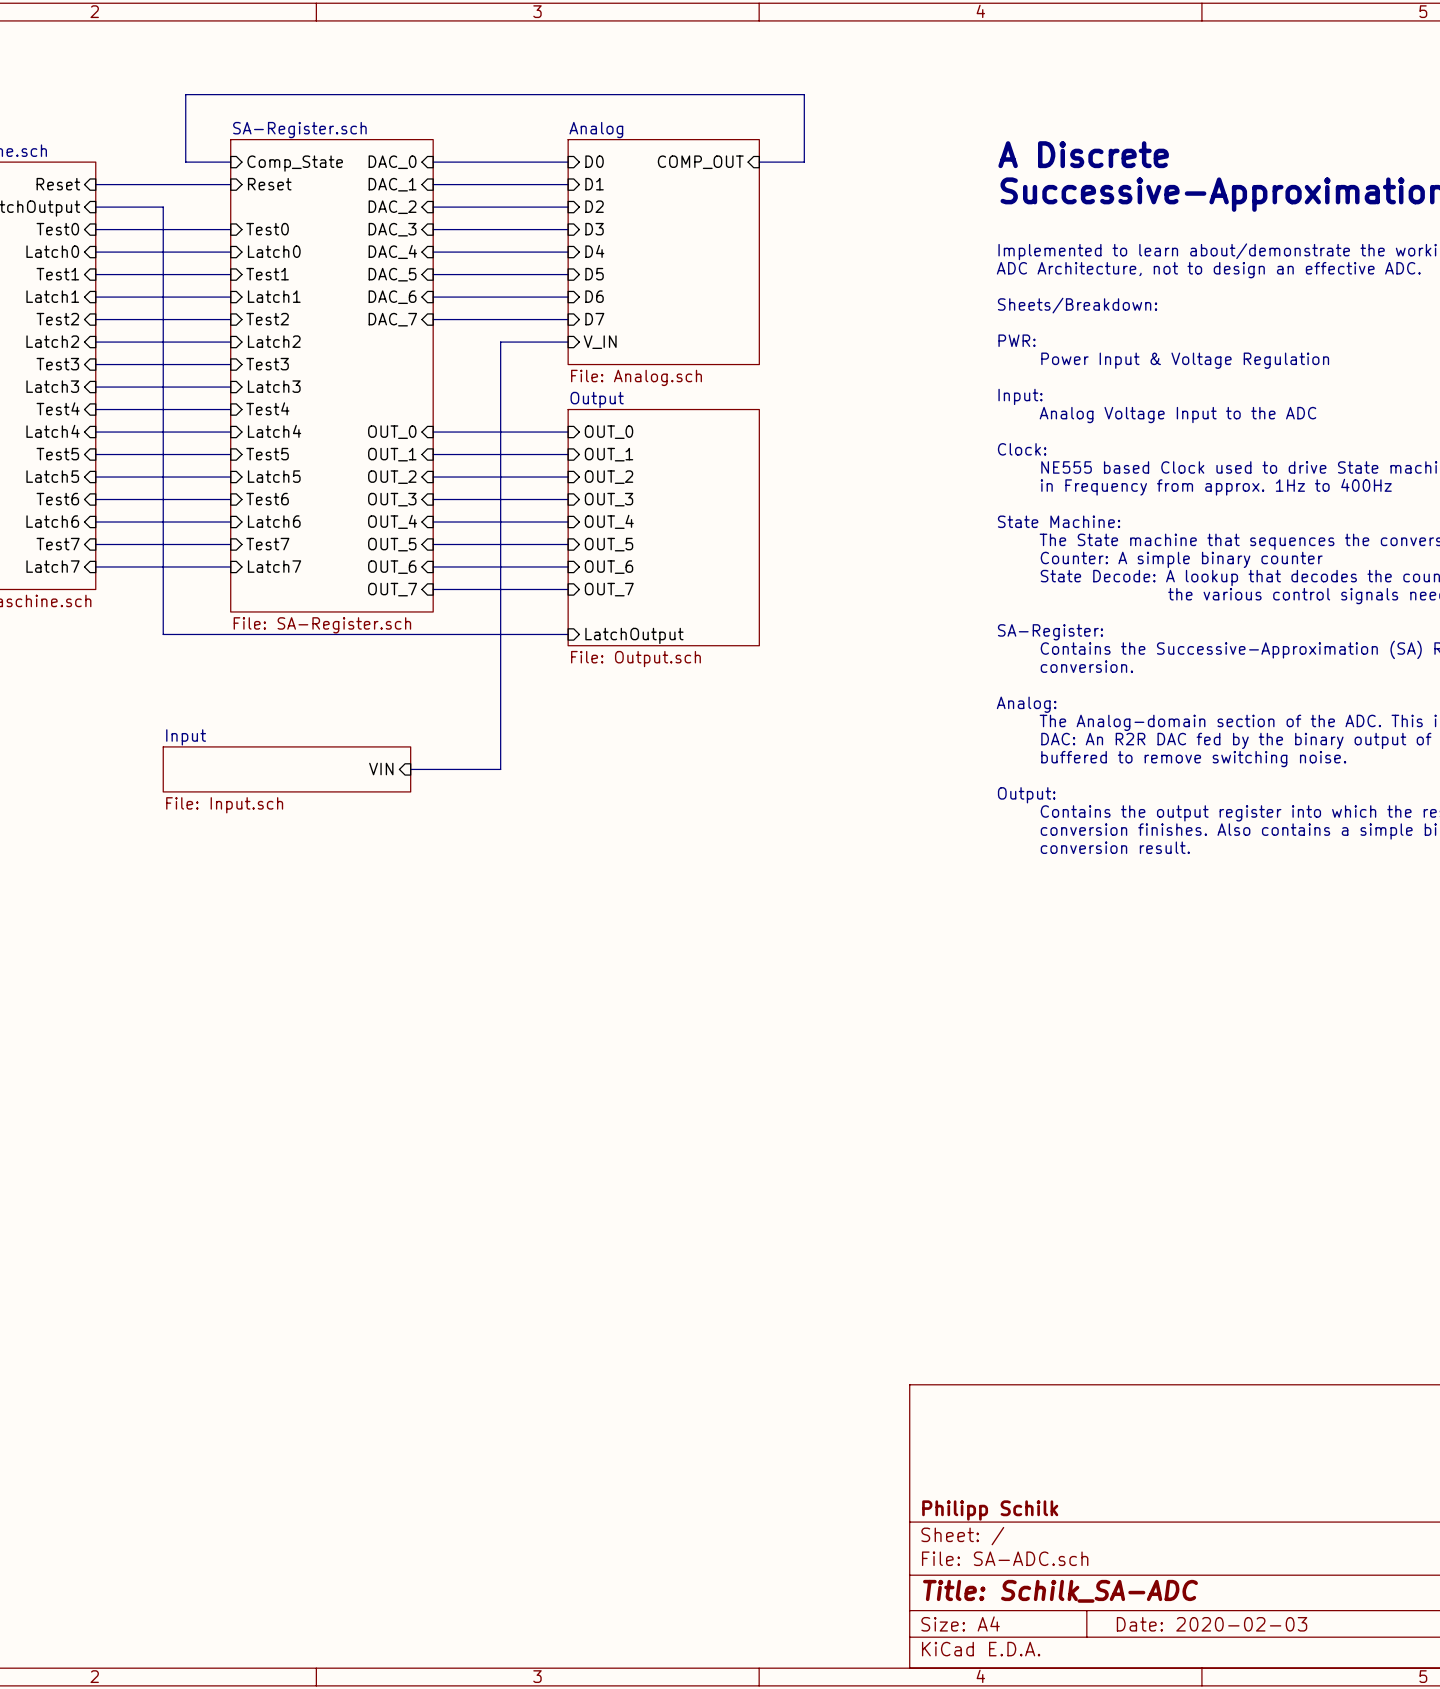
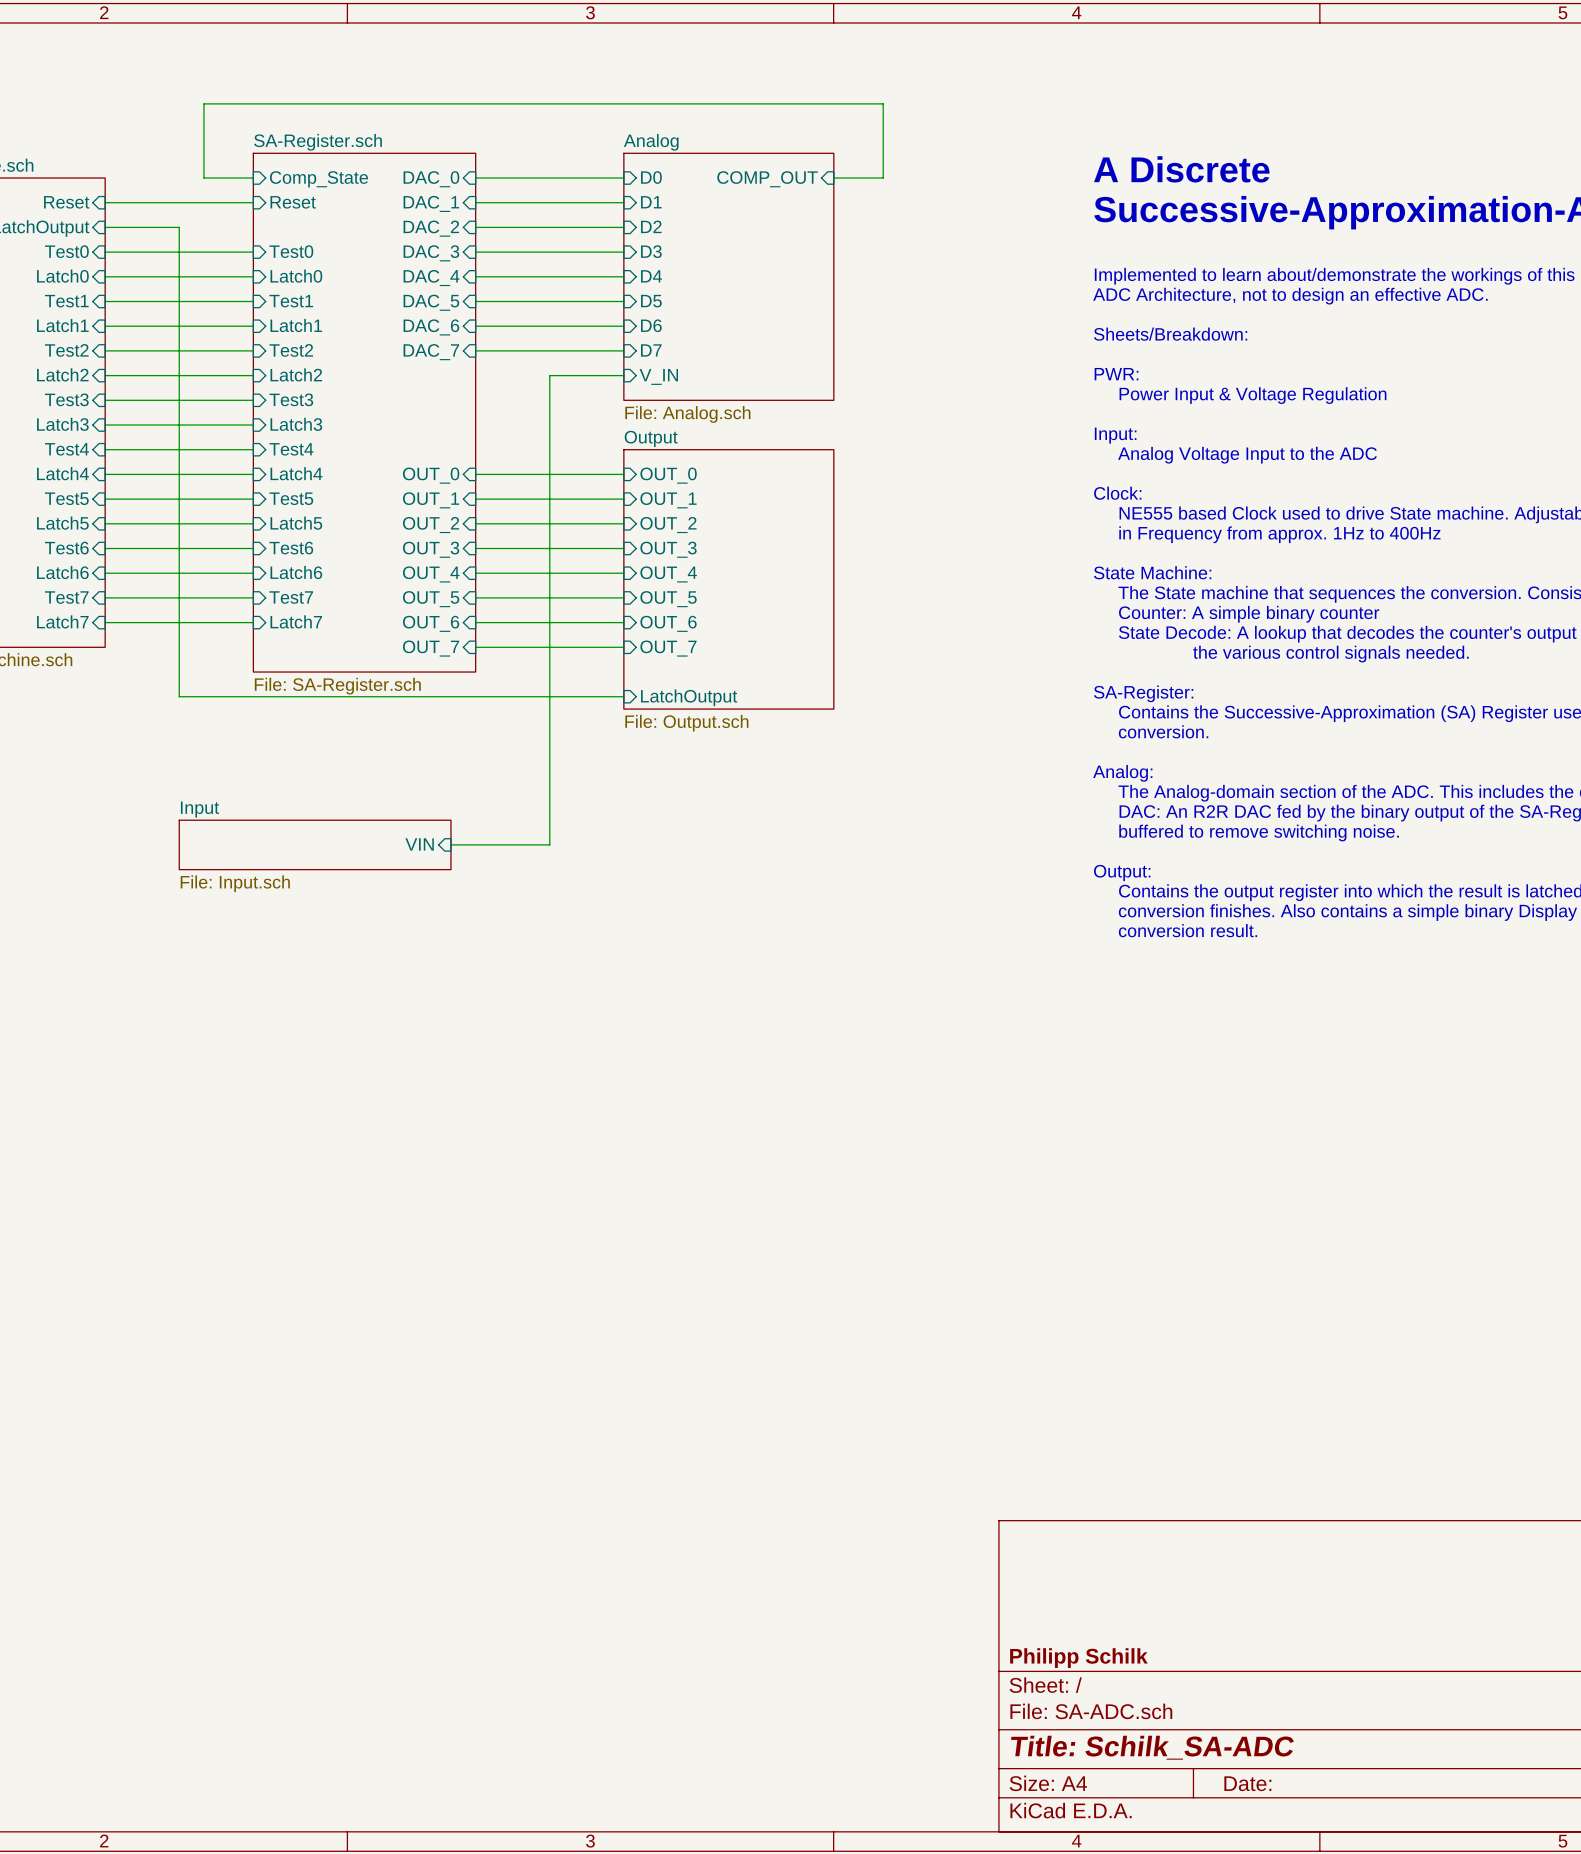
title block: Date: 2020-02-03 (1212, 1624) -> Date: (1247, 1783)

